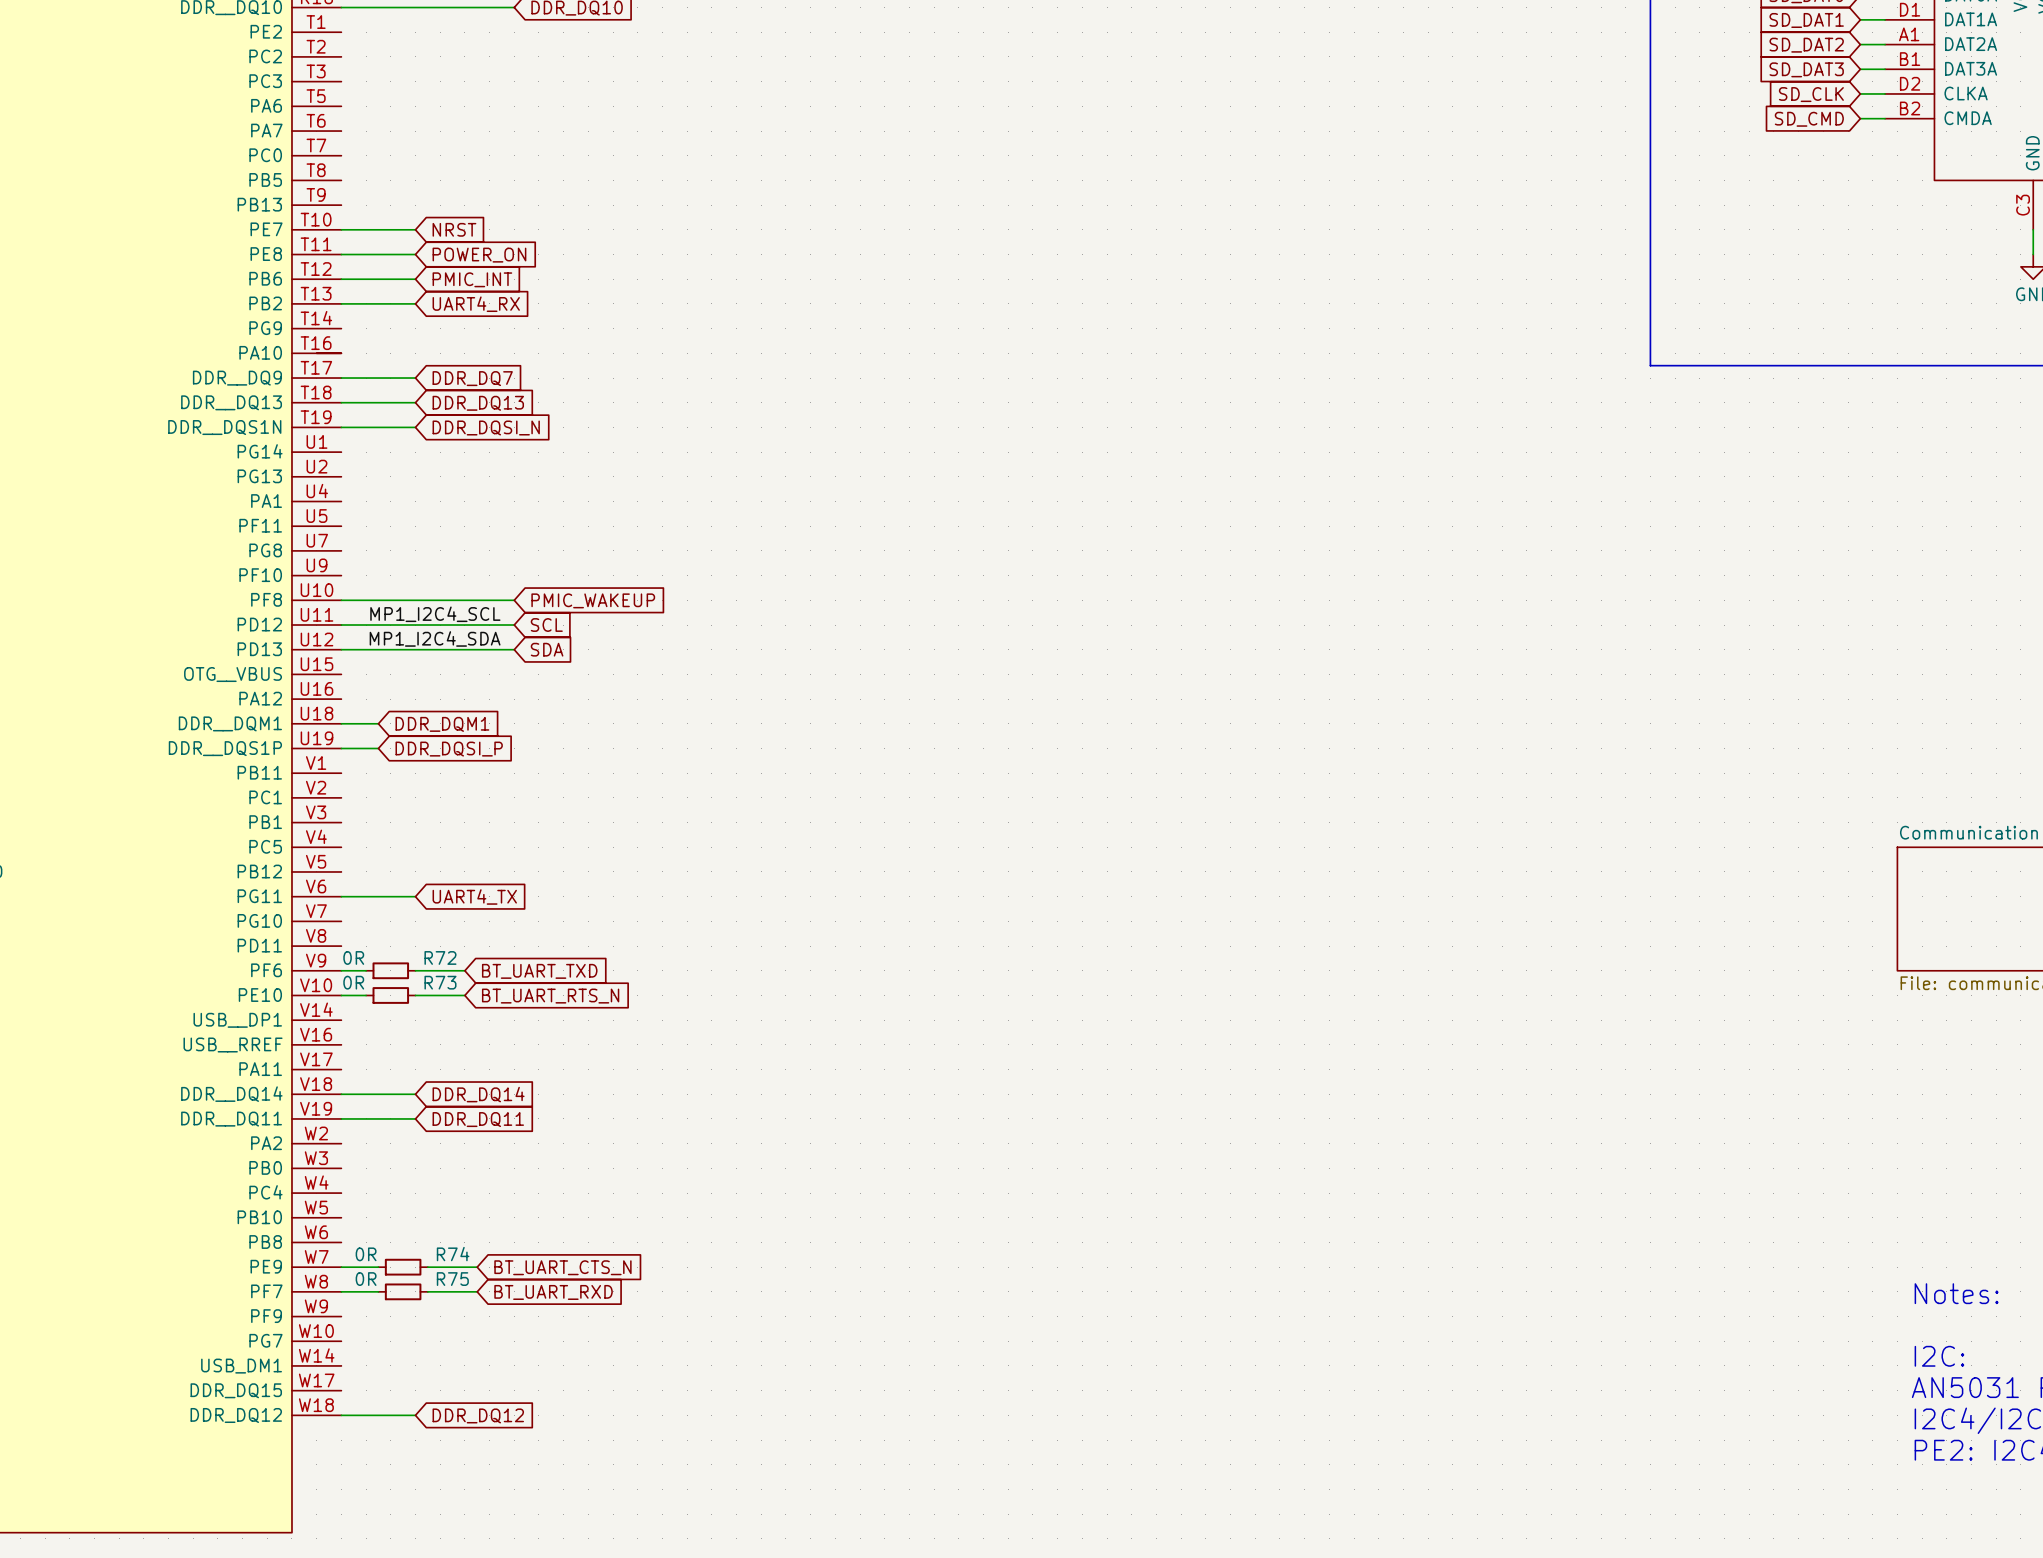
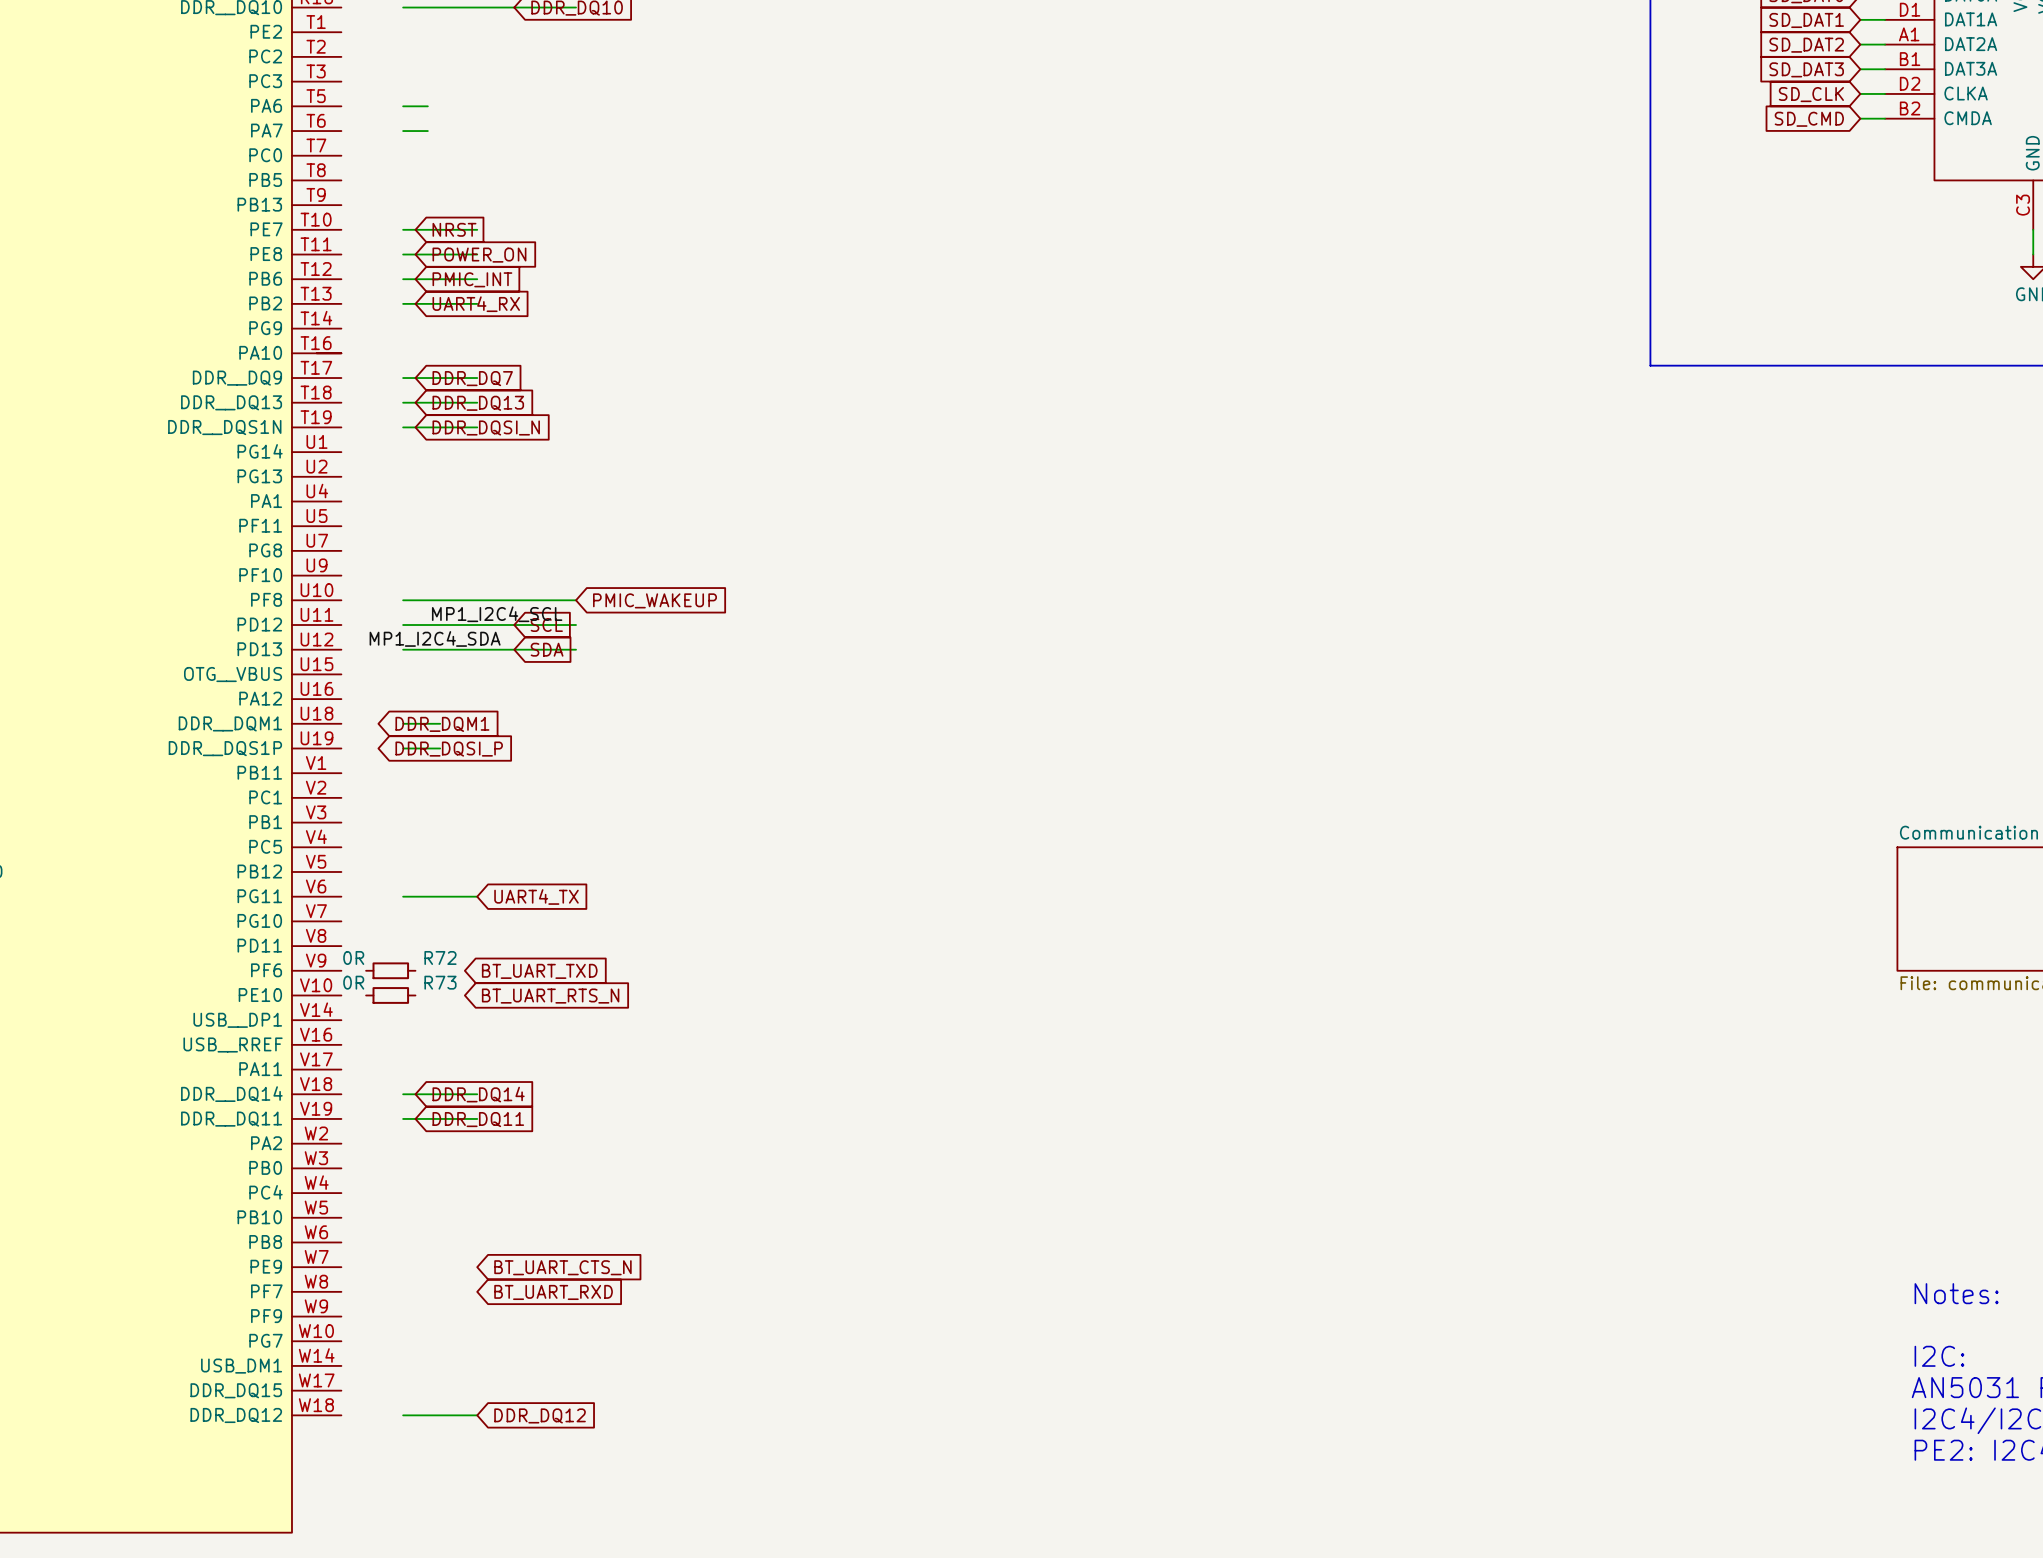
wire: (341, 7) (403, 7) -> (514, 7) (576, 7)
wire: none -> (403, 106) (427, 106)
wire: none -> (403, 131) (427, 131)
wire: (341, 229) (403, 229) -> (415, 229) (477, 229)
wire: (341, 254) (403, 254) -> (415, 254) (477, 254)
wire: (341, 279) (403, 279) -> (415, 279) (477, 279)
wire: (341, 303) (403, 303) -> (415, 303) (477, 303)
wire: (341, 378) (403, 378) -> (415, 378) (477, 378)
wire: (341, 402) (403, 402) -> (415, 402) (477, 402)
wire: (341, 427) (403, 427) -> (415, 427) (477, 427)
wire: (341, 600) (403, 600) -> (514, 600) (576, 600)
global label position: PMIC_WAKEUP (593, 600) -> PMIC_WAKEUP (654, 600)
label position: MP1_I2C4_SCL (435, 614) -> MP1_I2C4_SCL (497, 614)
wire: (341, 625) (403, 625) -> (514, 625) (576, 625)
wire: (341, 649) (403, 649) -> (514, 649) (576, 649)
wire: (341, 723) (378, 723) -> (403, 723) (440, 723)
wire: (341, 748) (378, 748) -> (403, 748) (440, 748)
wire: (341, 896) (403, 896) -> (415, 896) (477, 896)
global label position: UART4_TX (474, 896) -> UART4_TX (536, 896)
wire: (341, 970) (366, 970) -> none
wire: (415, 970) (464, 970) -> none
wire: (341, 995) (366, 995) -> none
wire: (415, 995) (464, 995) -> none
wire: (341, 1094) (403, 1094) -> (415, 1094) (477, 1094)
wire: (341, 1118) (403, 1118) -> (415, 1118) (477, 1118)
wire: (341, 1267) (378, 1267) -> none
R74: 0R (403, 1267) -> none
wire: (427, 1267) (477, 1267) -> none
wire: (341, 1291) (378, 1291) -> none
R75: 0R (403, 1291) -> none
wire: (427, 1291) (477, 1291) -> none
wire: (341, 1415) (403, 1415) -> (415, 1415) (477, 1415)
global label position: DDR_DQ12 (478, 1415) -> DDR_DQ12 (540, 1415)

